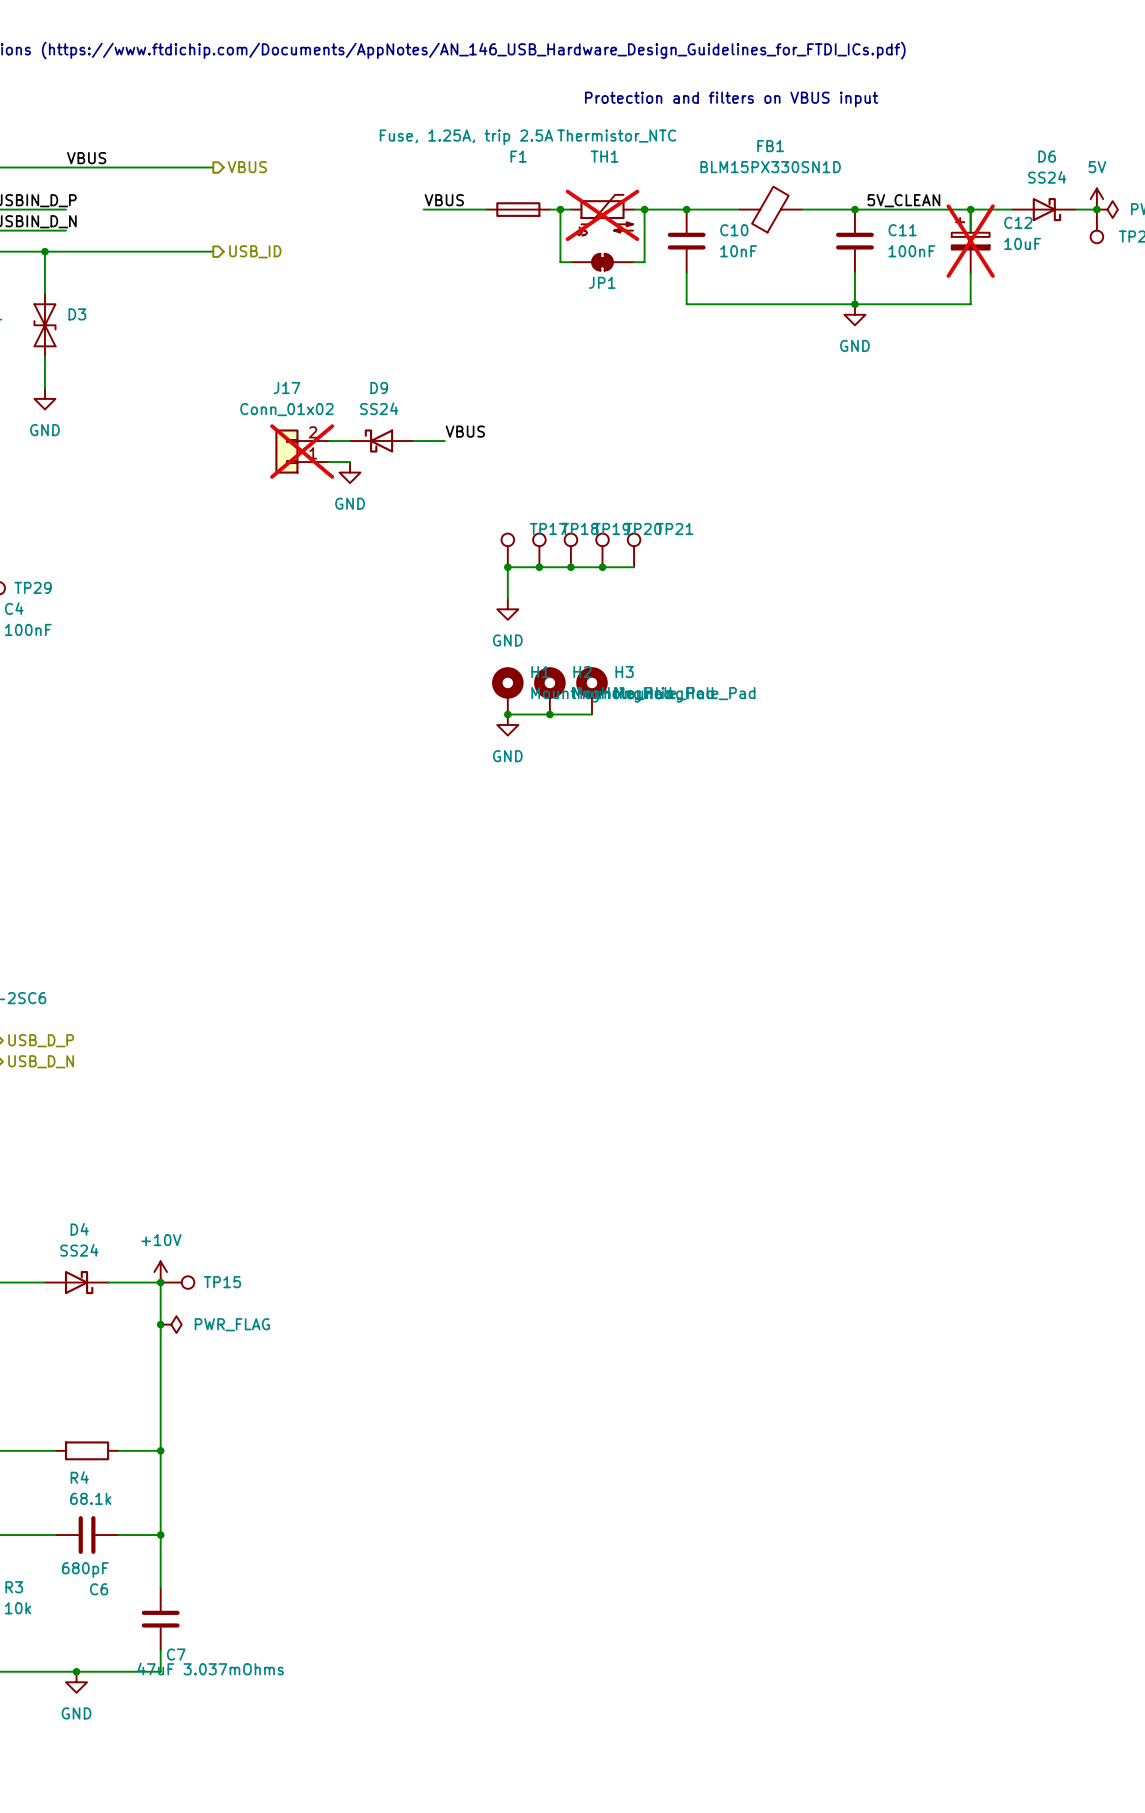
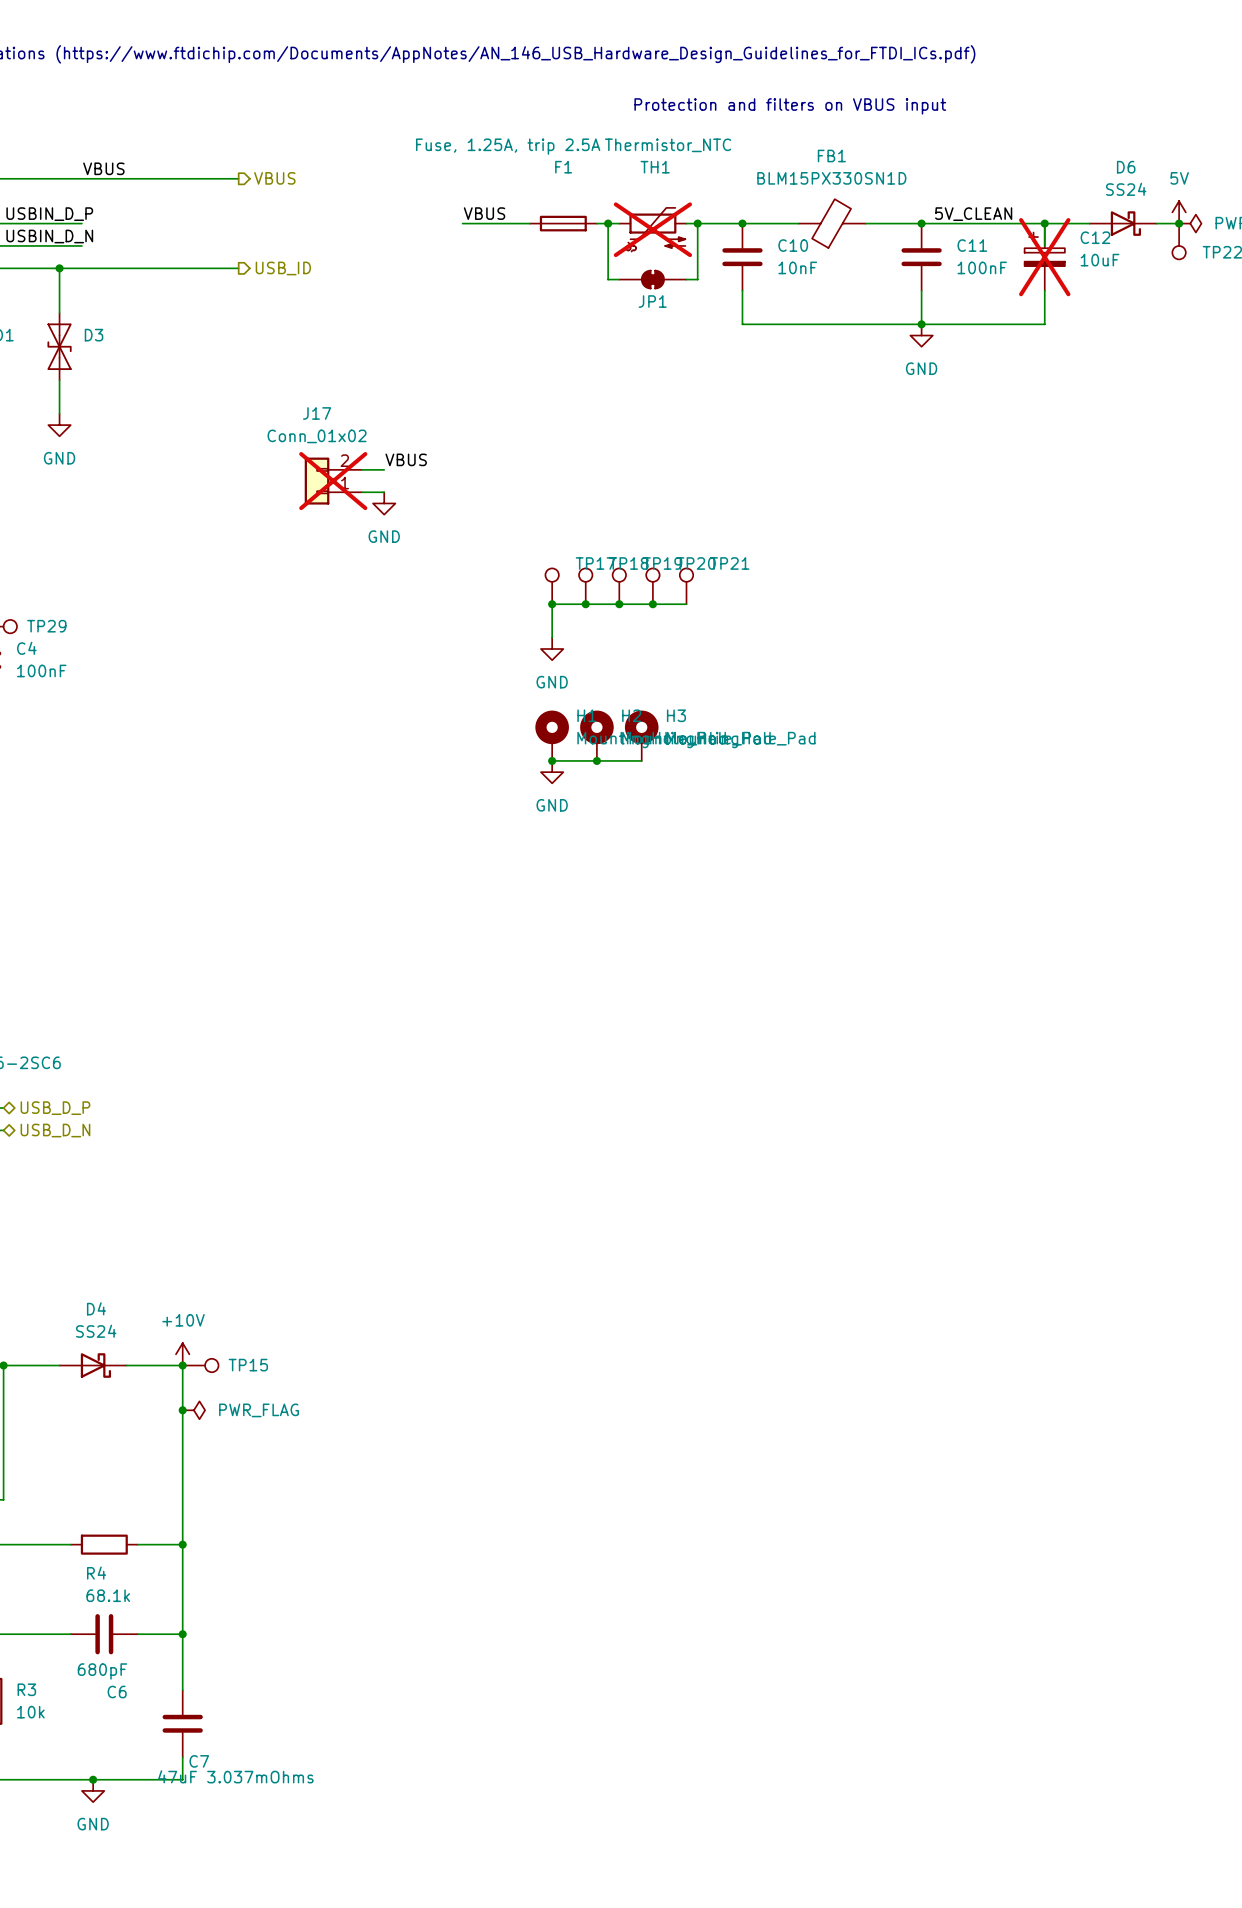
label position: VBUS (465, 431) -> VBUS (406, 459)
D9: SS24 (381, 441) -> none
wire: (413, 441) (444, 441) -> none

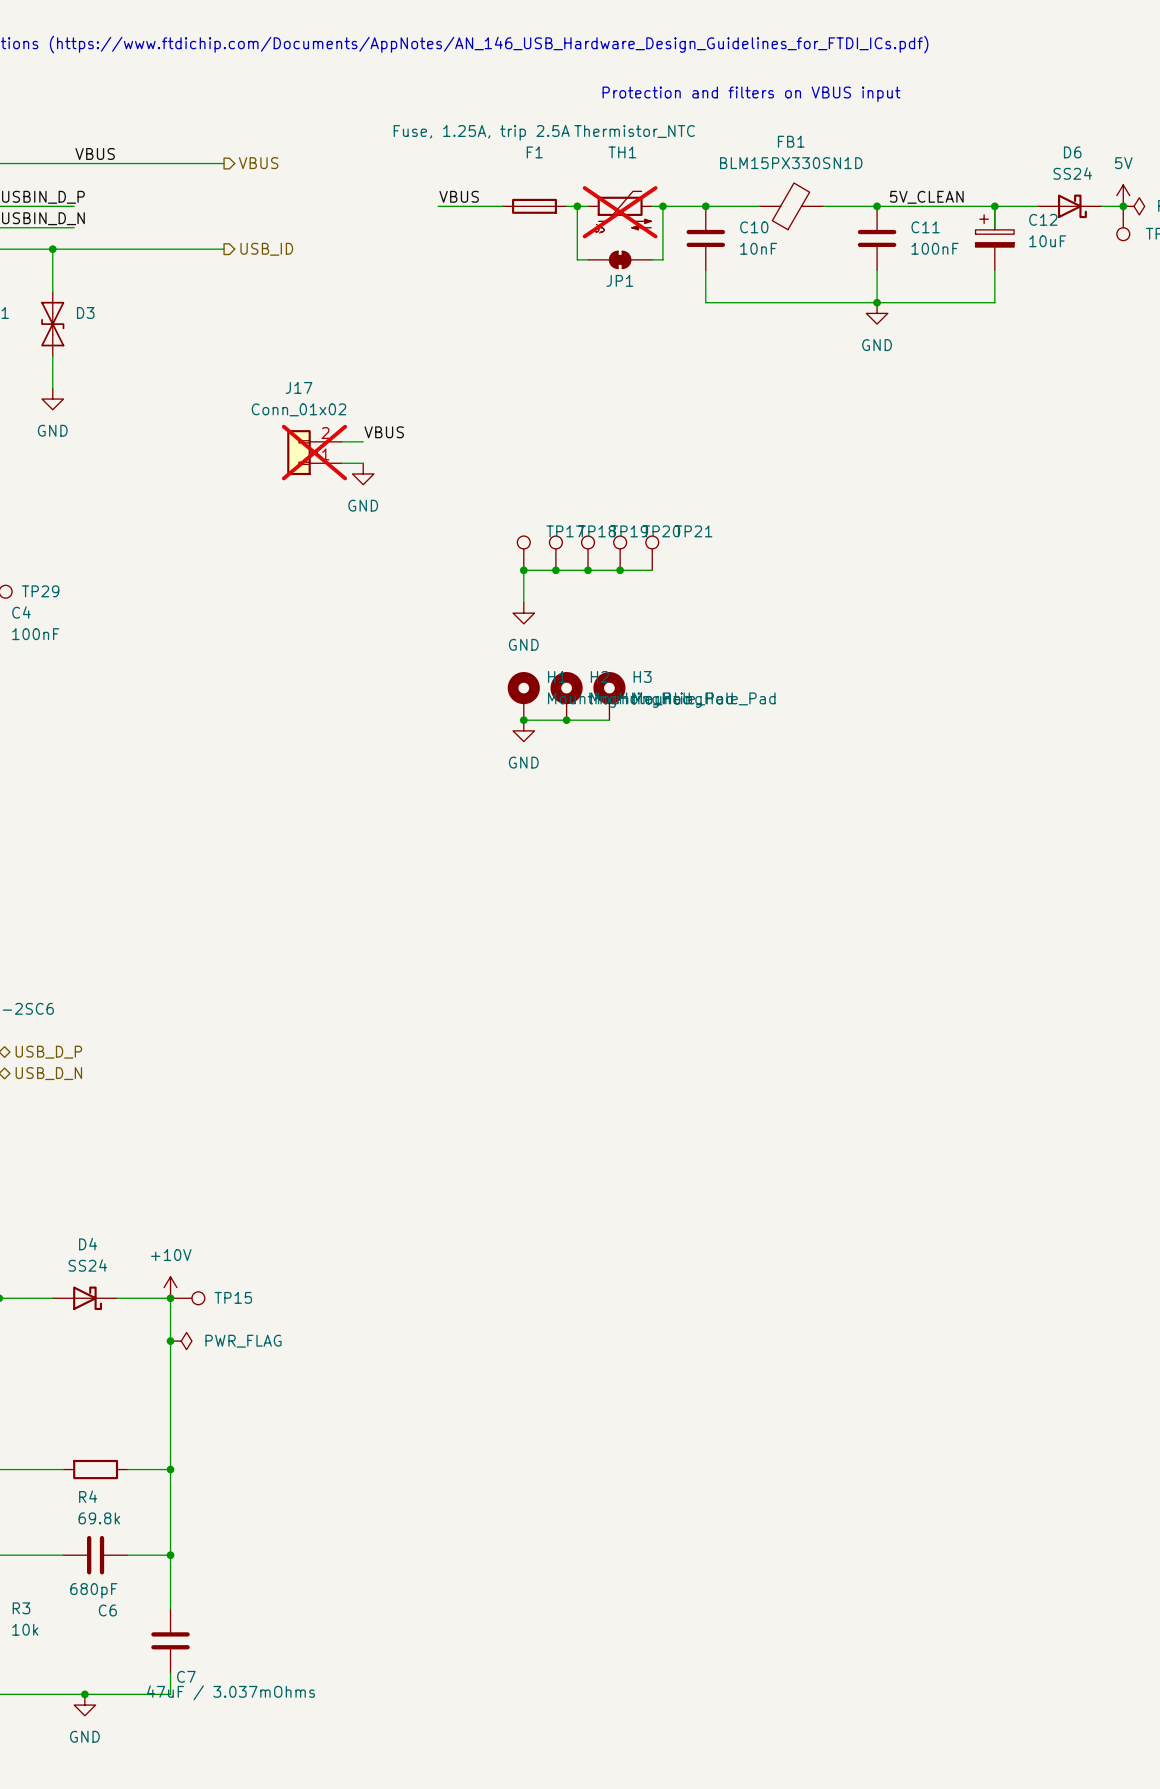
C12 do-not-place cross: (1044, 257) -> none
R4 value: 68.1k (108, 1595) -> 69.8k (99, 1518)
C7 value: 47uF 3.037mOhms (235, 1776) -> 47uF / 3.037mOhms (231, 1692)

